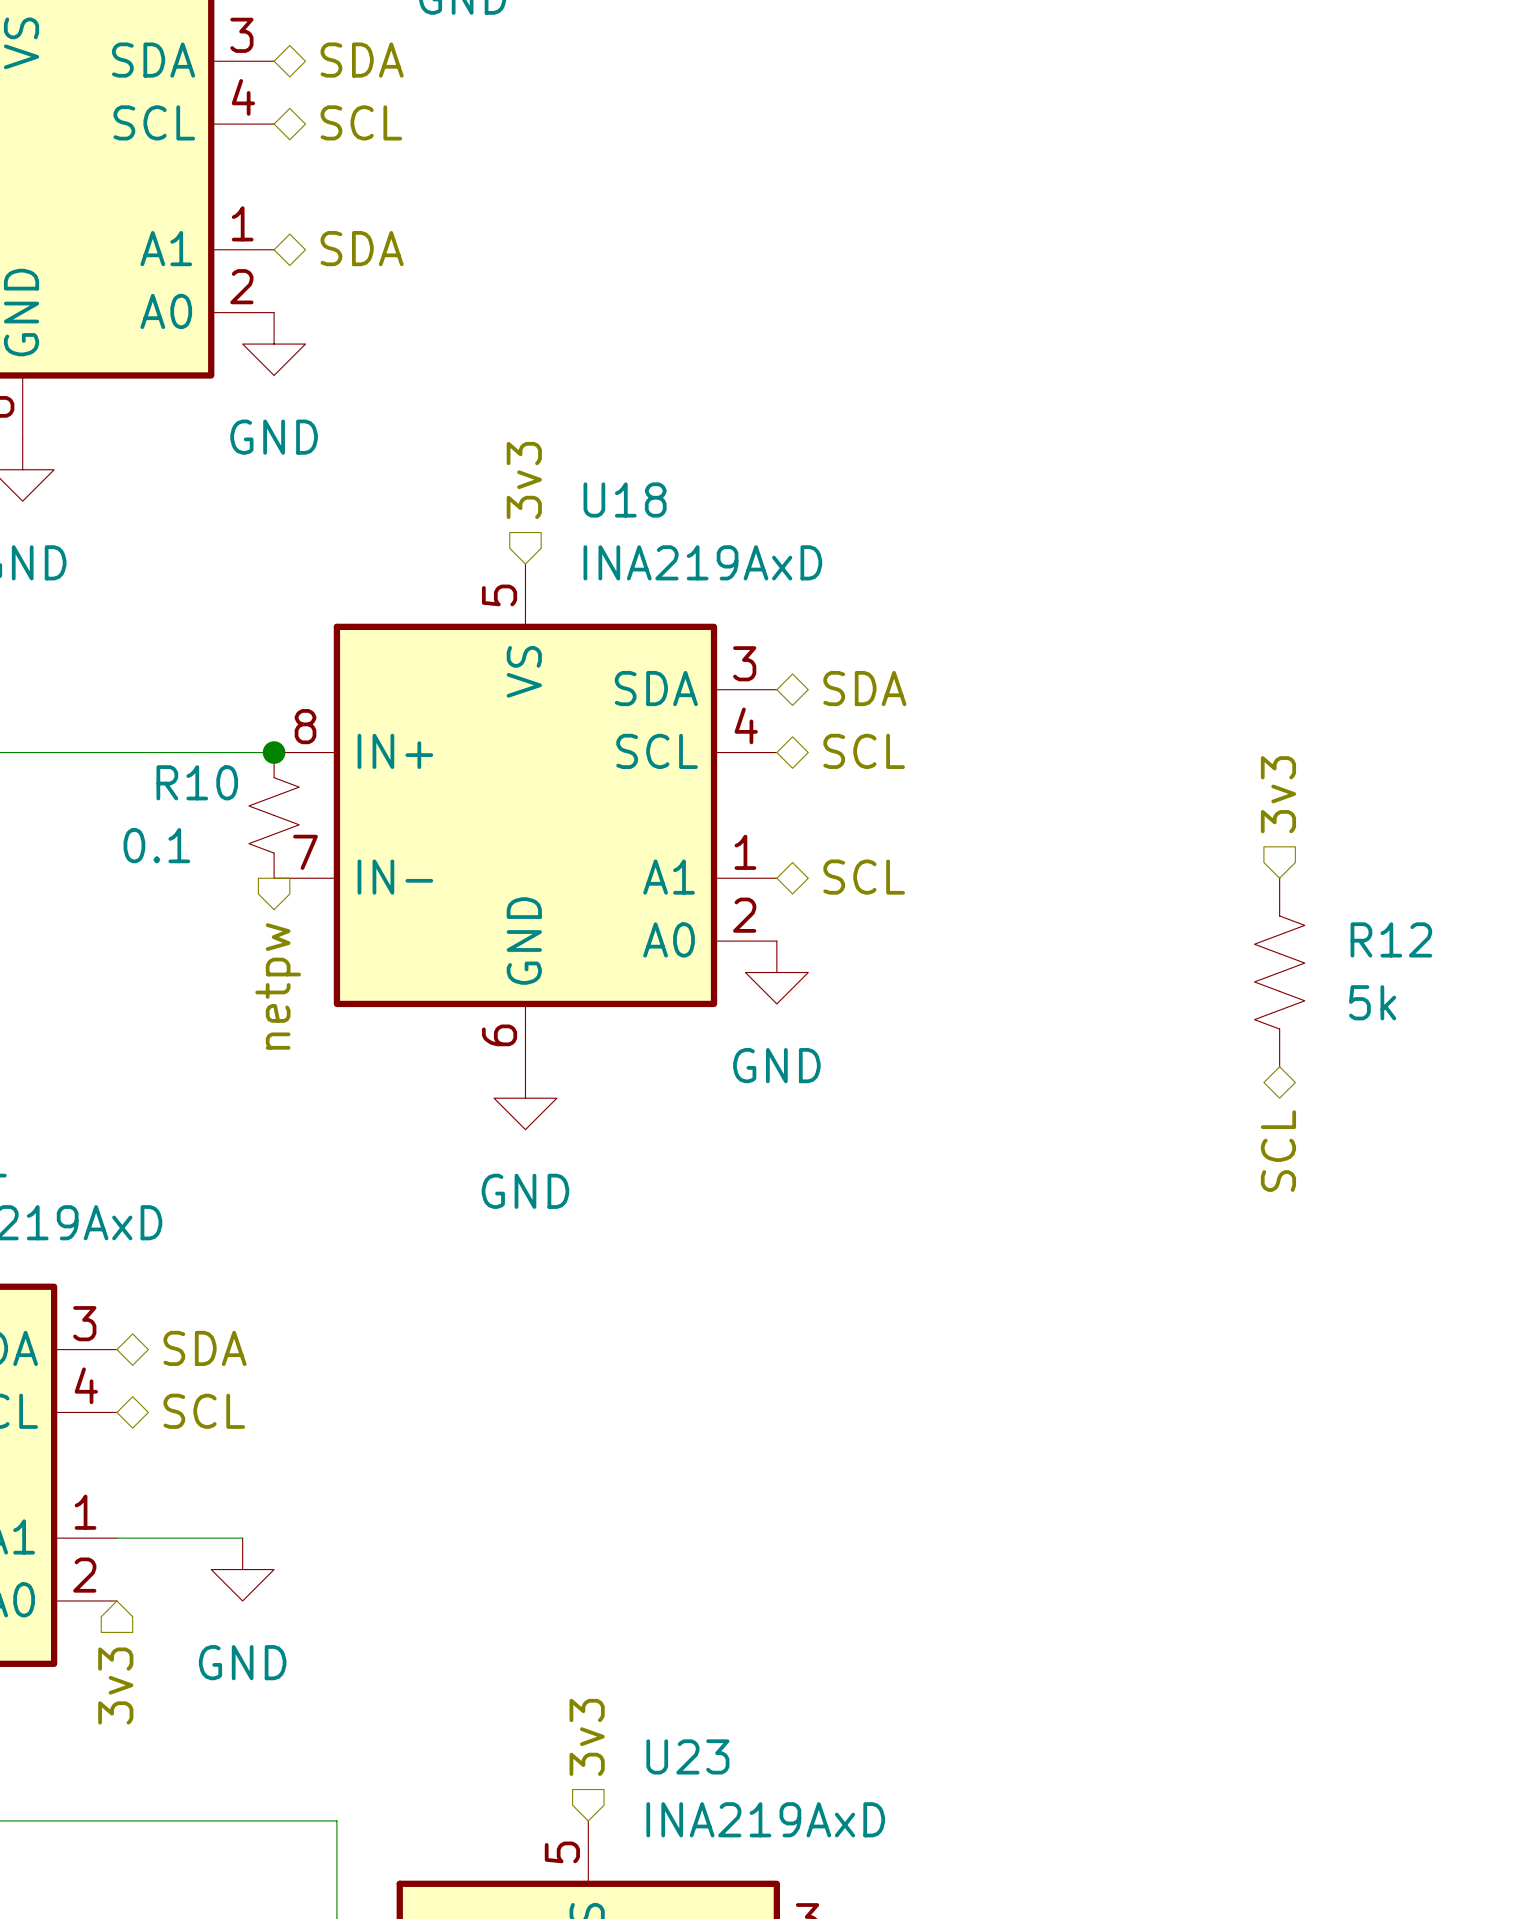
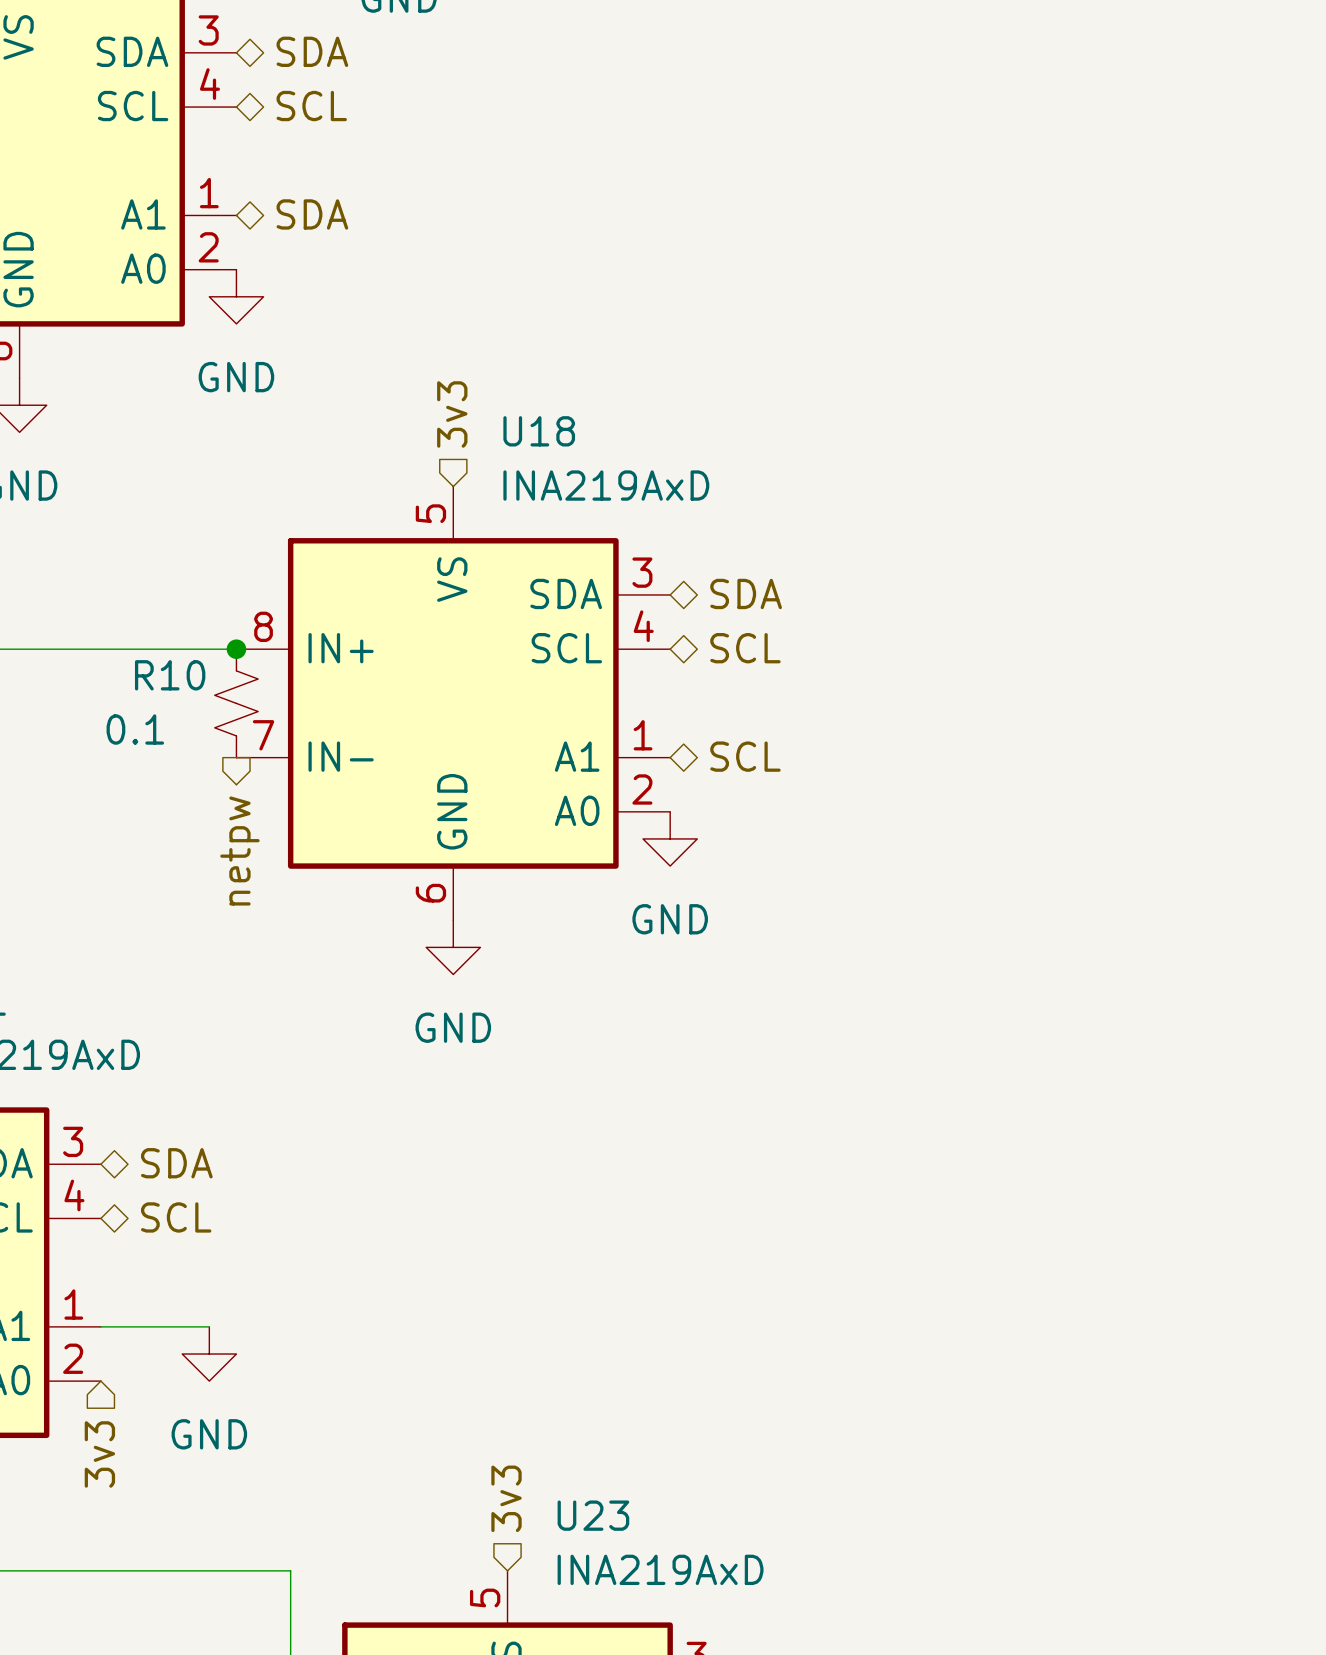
hierarchical label: 3v3 (1278, 794) -> none
R12: 5k (1279, 972) -> none
hierarchical label: SCL (1278, 1151) -> none

